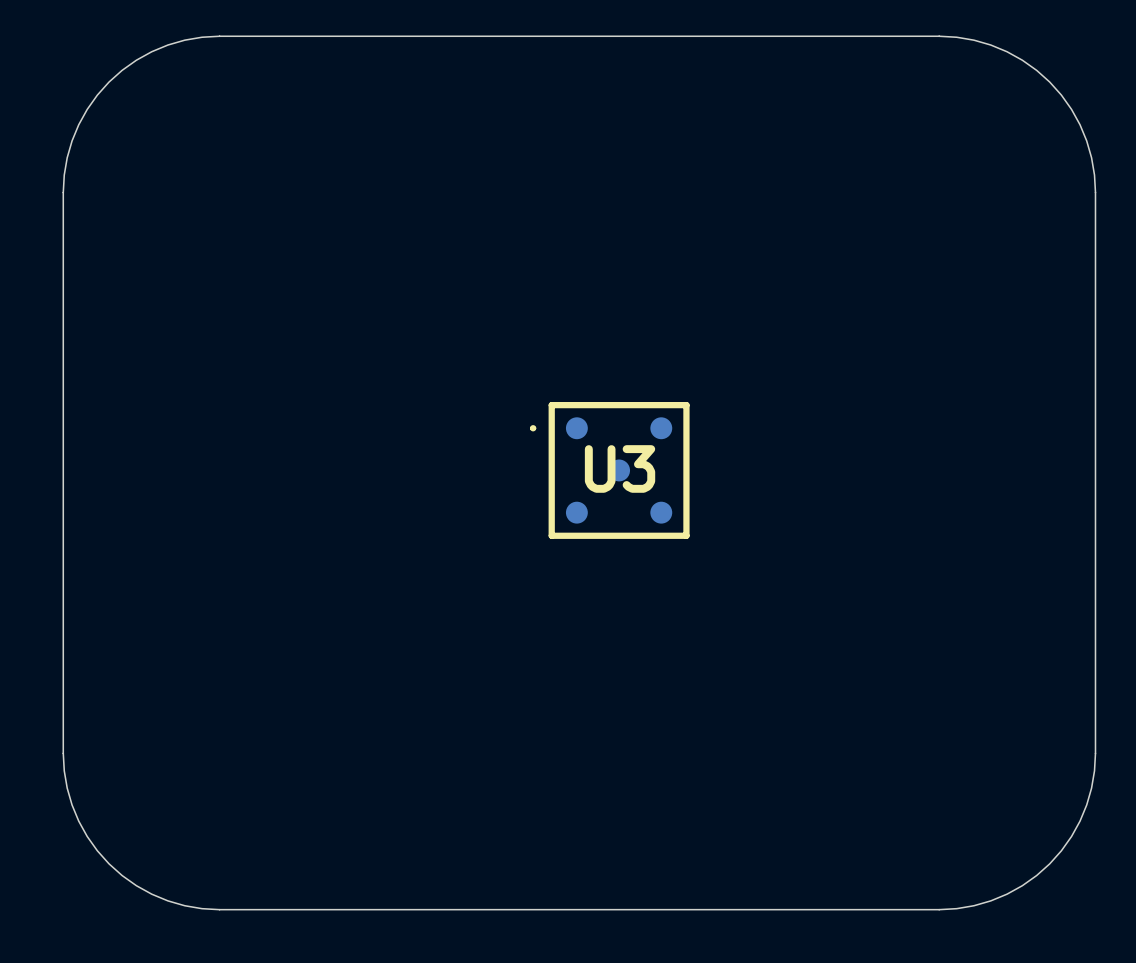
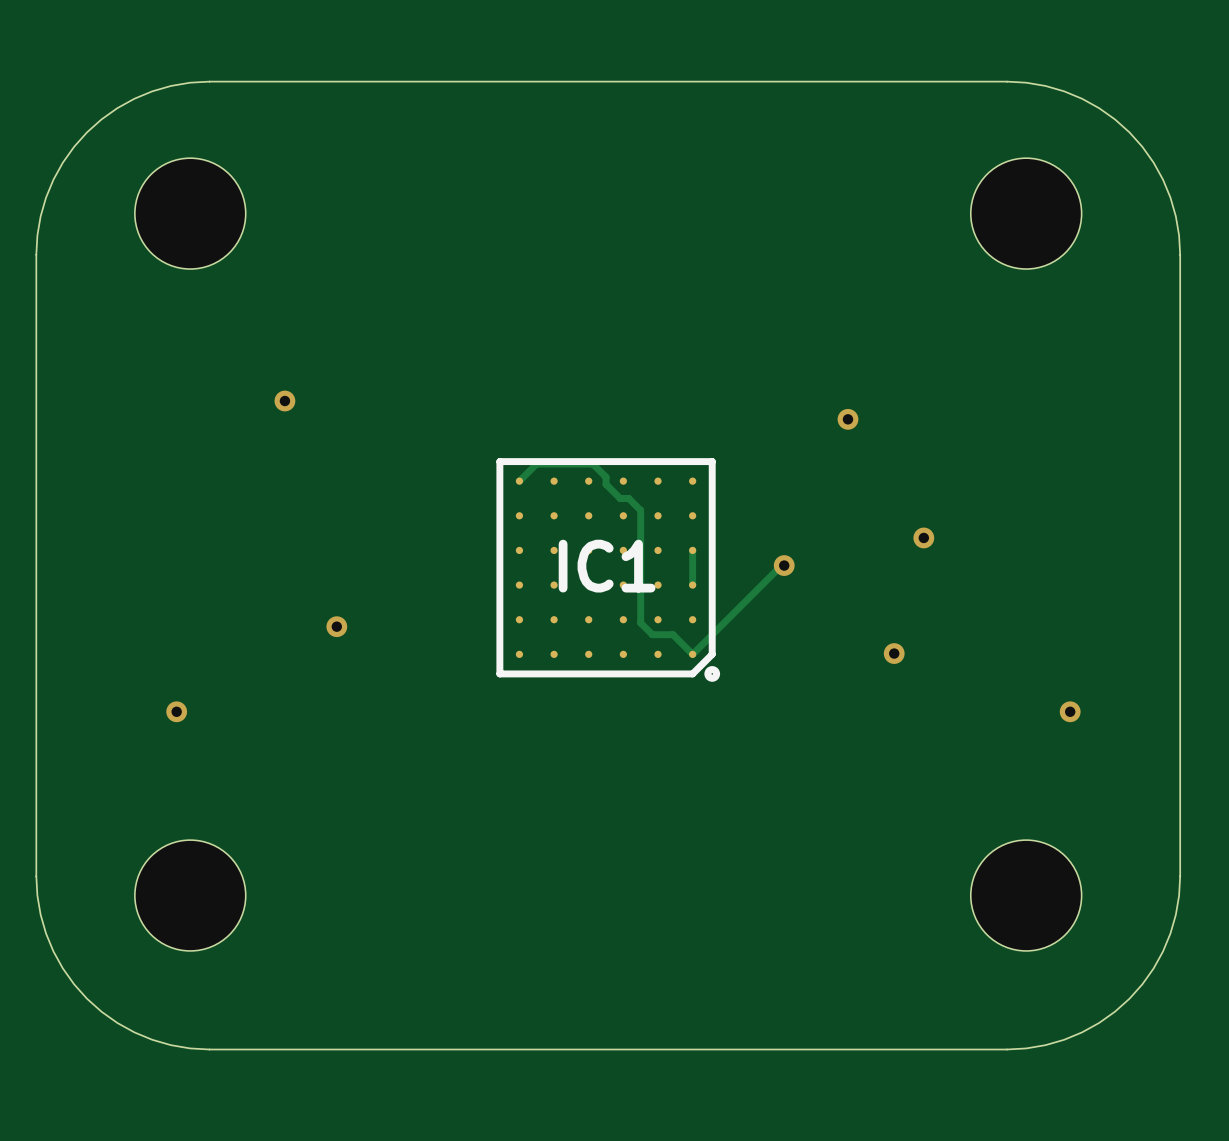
part: none -> (190, 213)
part: none -> (1026, 213)
via: none -> (284, 401)
via: none -> (847, 419)
track: none -> (519, 481) (536, 464) (592, 464) (606, 477) (606, 484) (620, 498) (628, 498) (640, 510) (640, 622) (652, 634) (672, 634) (692, 654) (781, 565) (784, 565)
via: none -> (923, 537)
track: none -> (692, 550) (692, 585)
U3: (609, 470) -> none
via: none -> (784, 565)
IC1: none -> (608, 569)
via: none -> (336, 626)
via: none -> (894, 653)
via: none -> (176, 711)
via: none -> (1070, 711)
part: none -> (190, 895)
part: none -> (1026, 895)

